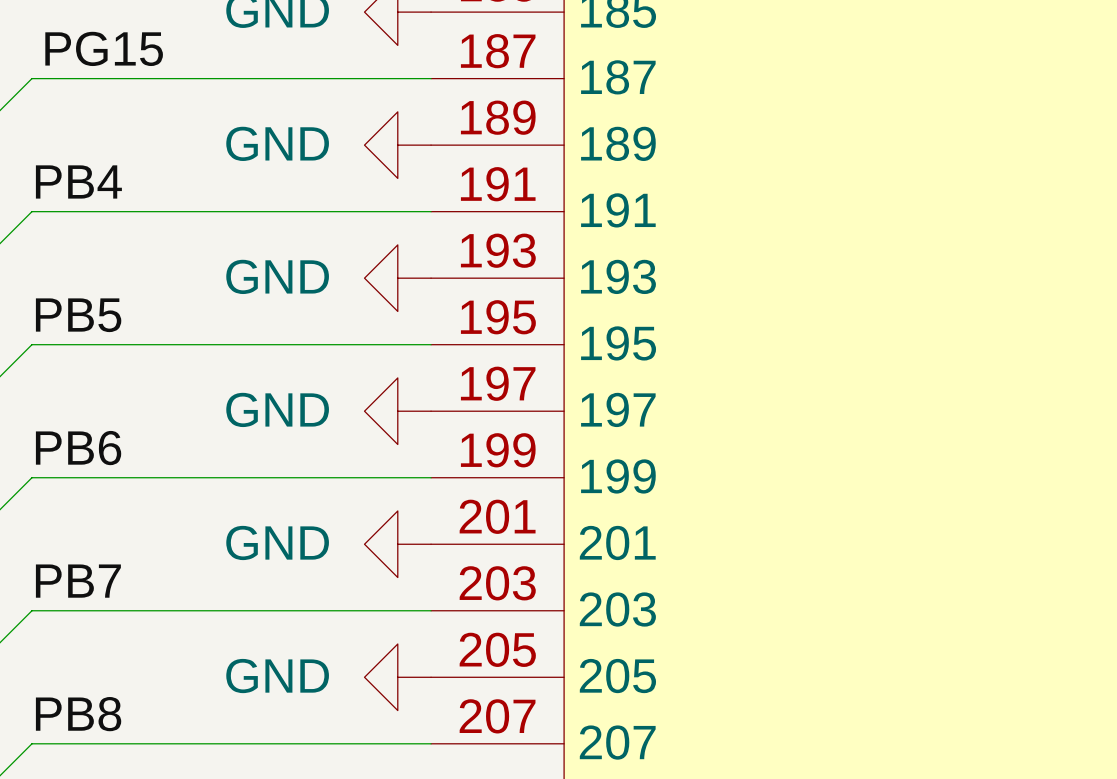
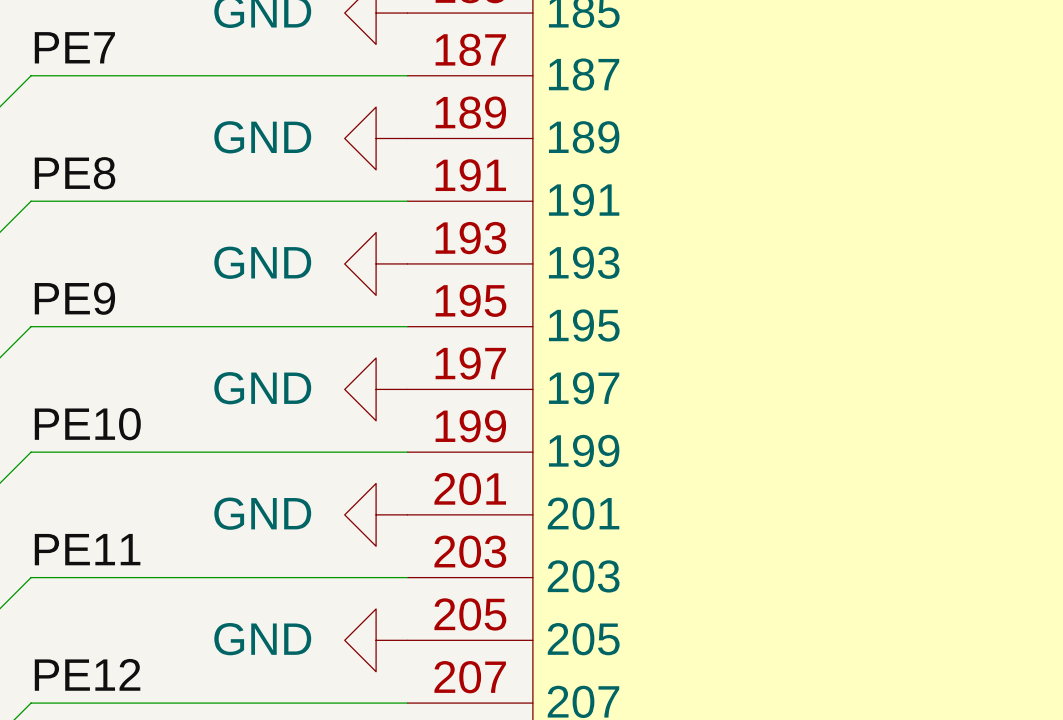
label: none -> PE7 (74, 47)
label: PG15 (104, 48) -> none
label: PB4 (78, 181) -> PE8 (75, 173)
label: PB5 (78, 315) -> PE9 (74, 298)
label: PB6 (78, 448) -> PE10 (87, 424)
label: PB7 (78, 581) -> PE11 (87, 549)
label: PB8 (78, 714) -> PE12 (87, 674)

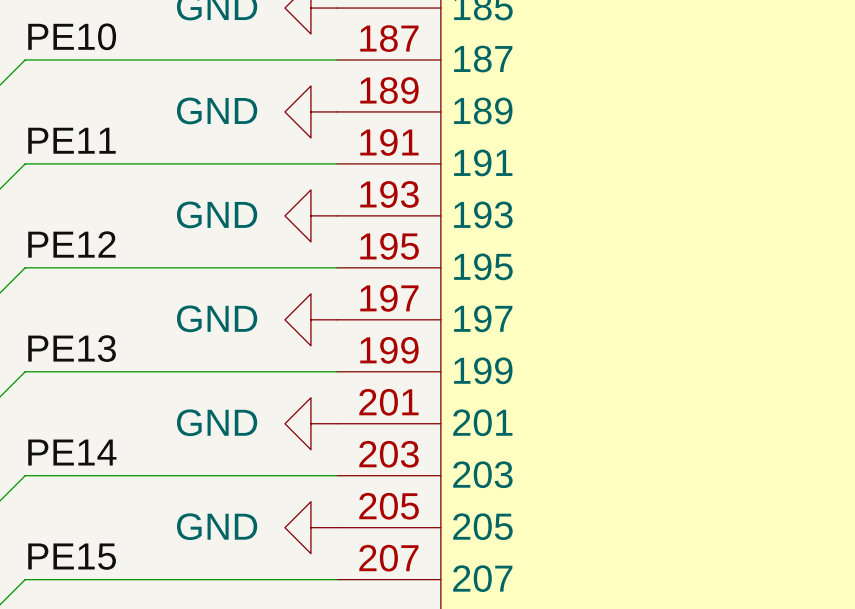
label: PE7 (74, 47) -> PE10 (72, 36)
label: PE8 (75, 173) -> PE11 (71, 140)
label: PE9 (74, 298) -> PE12 (71, 244)
label: PE10 (87, 424) -> PE13 (72, 348)
label: PE11 (87, 549) -> PE14 (72, 452)
label: PE12 (87, 674) -> PE15 (72, 556)

